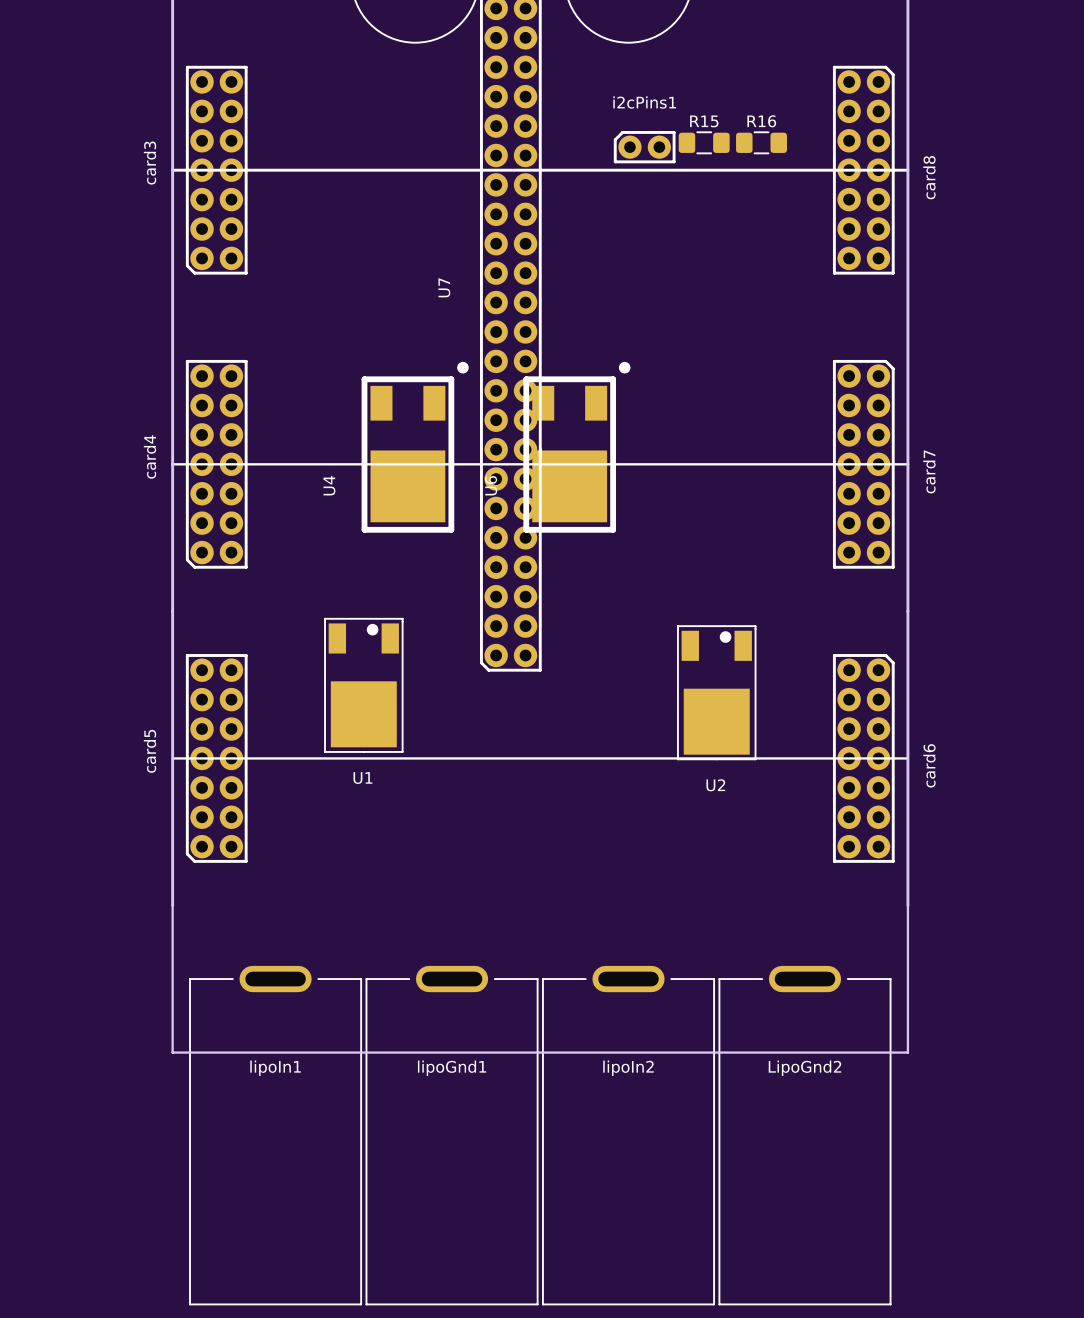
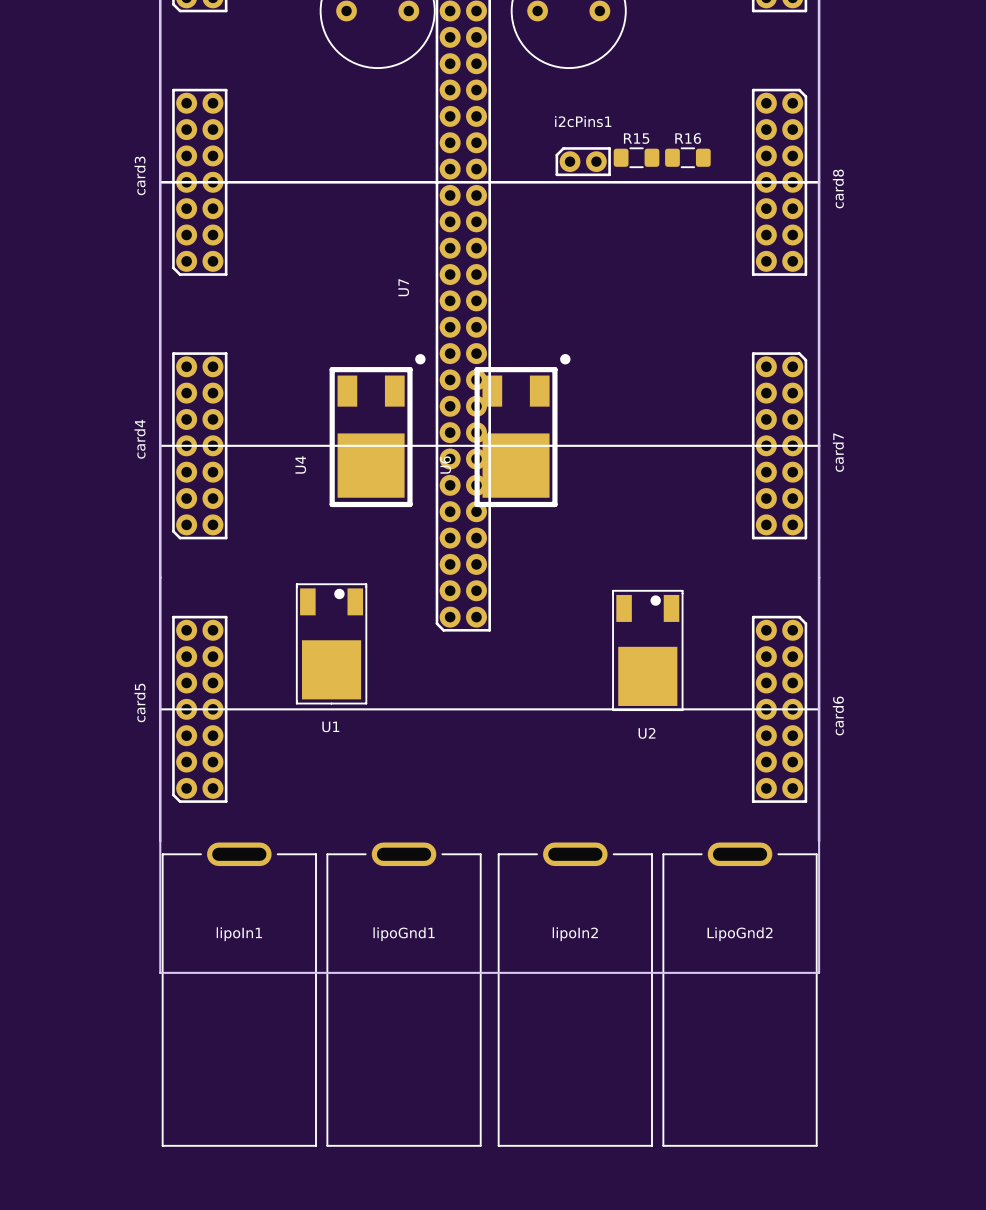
lipoIn1 position: (275, 1135) -> (239, 994)
lipoGnd1 position: (452, 1135) -> (404, 994)
lipoIn2 position: (628, 1135) -> (575, 994)
LipoGnd2 position: (804, 1135) -> (740, 994)

